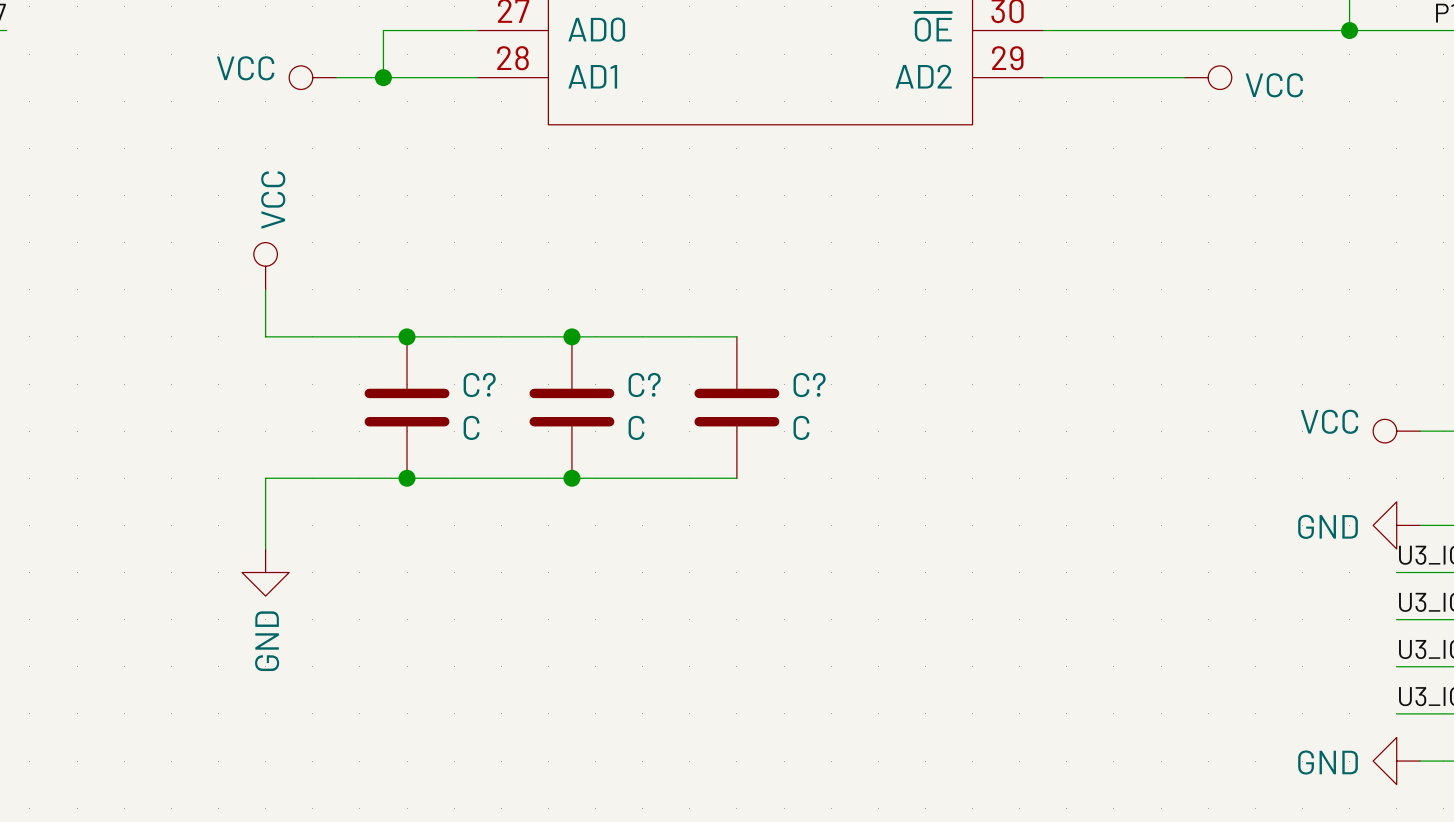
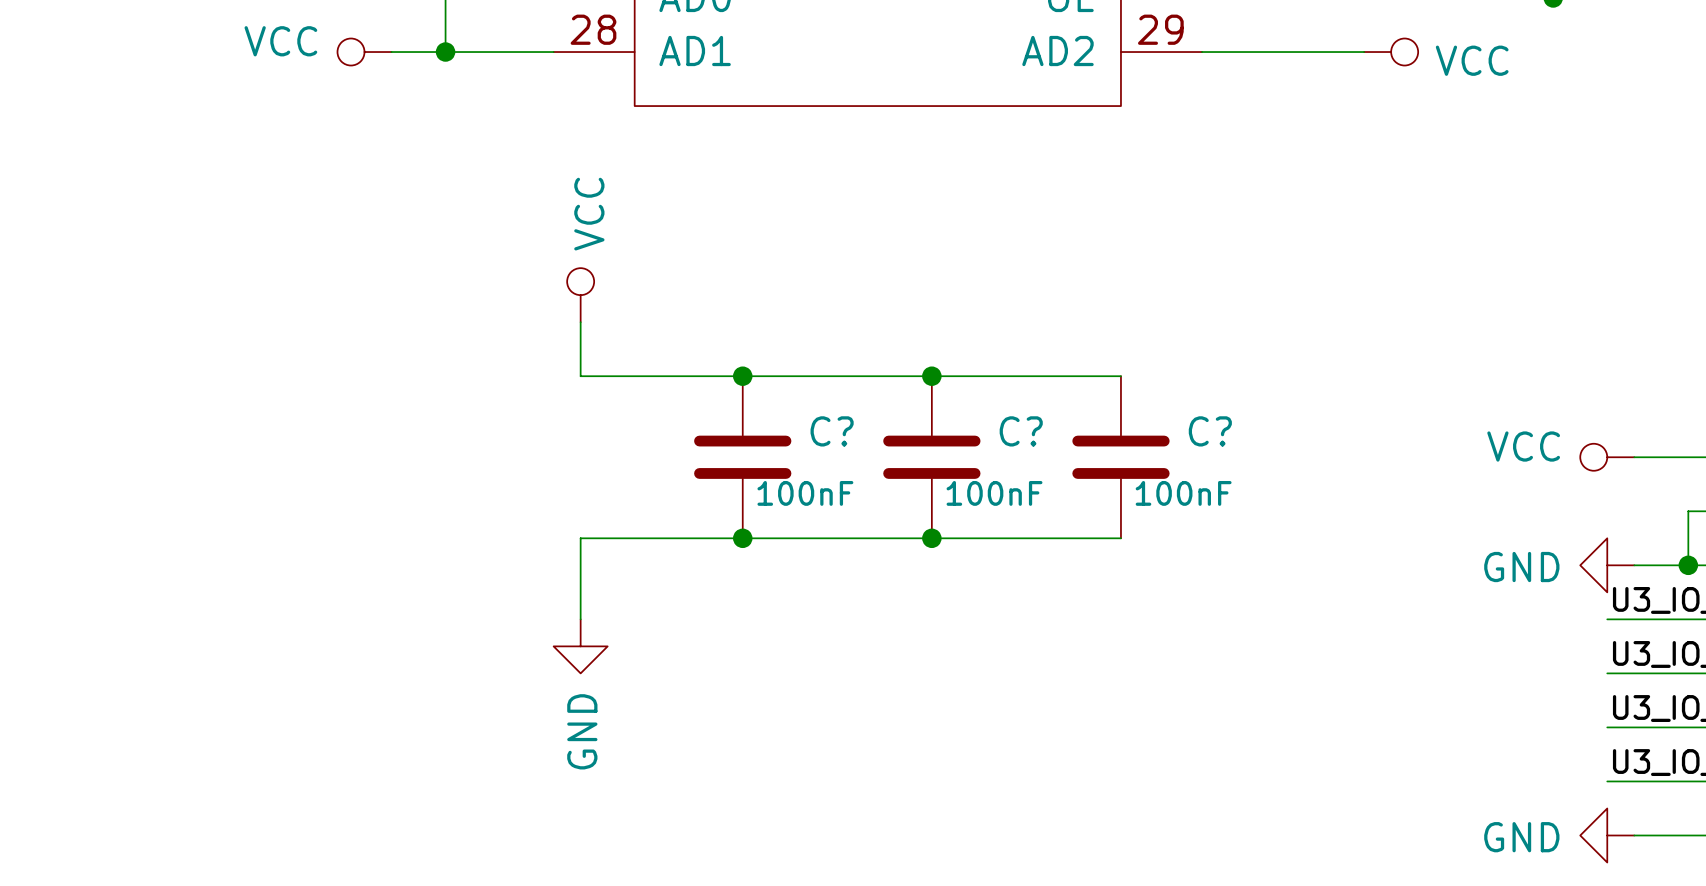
power symbol position: VCC (265, 266) -> VCC (580, 295)
wire: (265, 289) (265, 336) (736, 336) -> (580, 322) (580, 376) (1120, 376)
junction: (407, 336) -> none
junction: (571, 336) -> none
junction: none -> (742, 376)
junction: none -> (931, 376)
C?: C (407, 407) -> none
C?: C (571, 407) -> none
C?: C (736, 407) -> none
C?: none -> 100nF (742, 457)
C?: none -> 100nF (931, 457)
C?: none -> 100nF (1120, 457)
junction: (407, 478) -> none
junction: (571, 478) -> none
wire: (736, 478) (265, 478) (265, 548) -> (1120, 538) (580, 538) (580, 619)
junction: none -> (742, 538)
junction: none -> (931, 538)
power symbol position: GND (265, 572) -> GND (580, 646)

